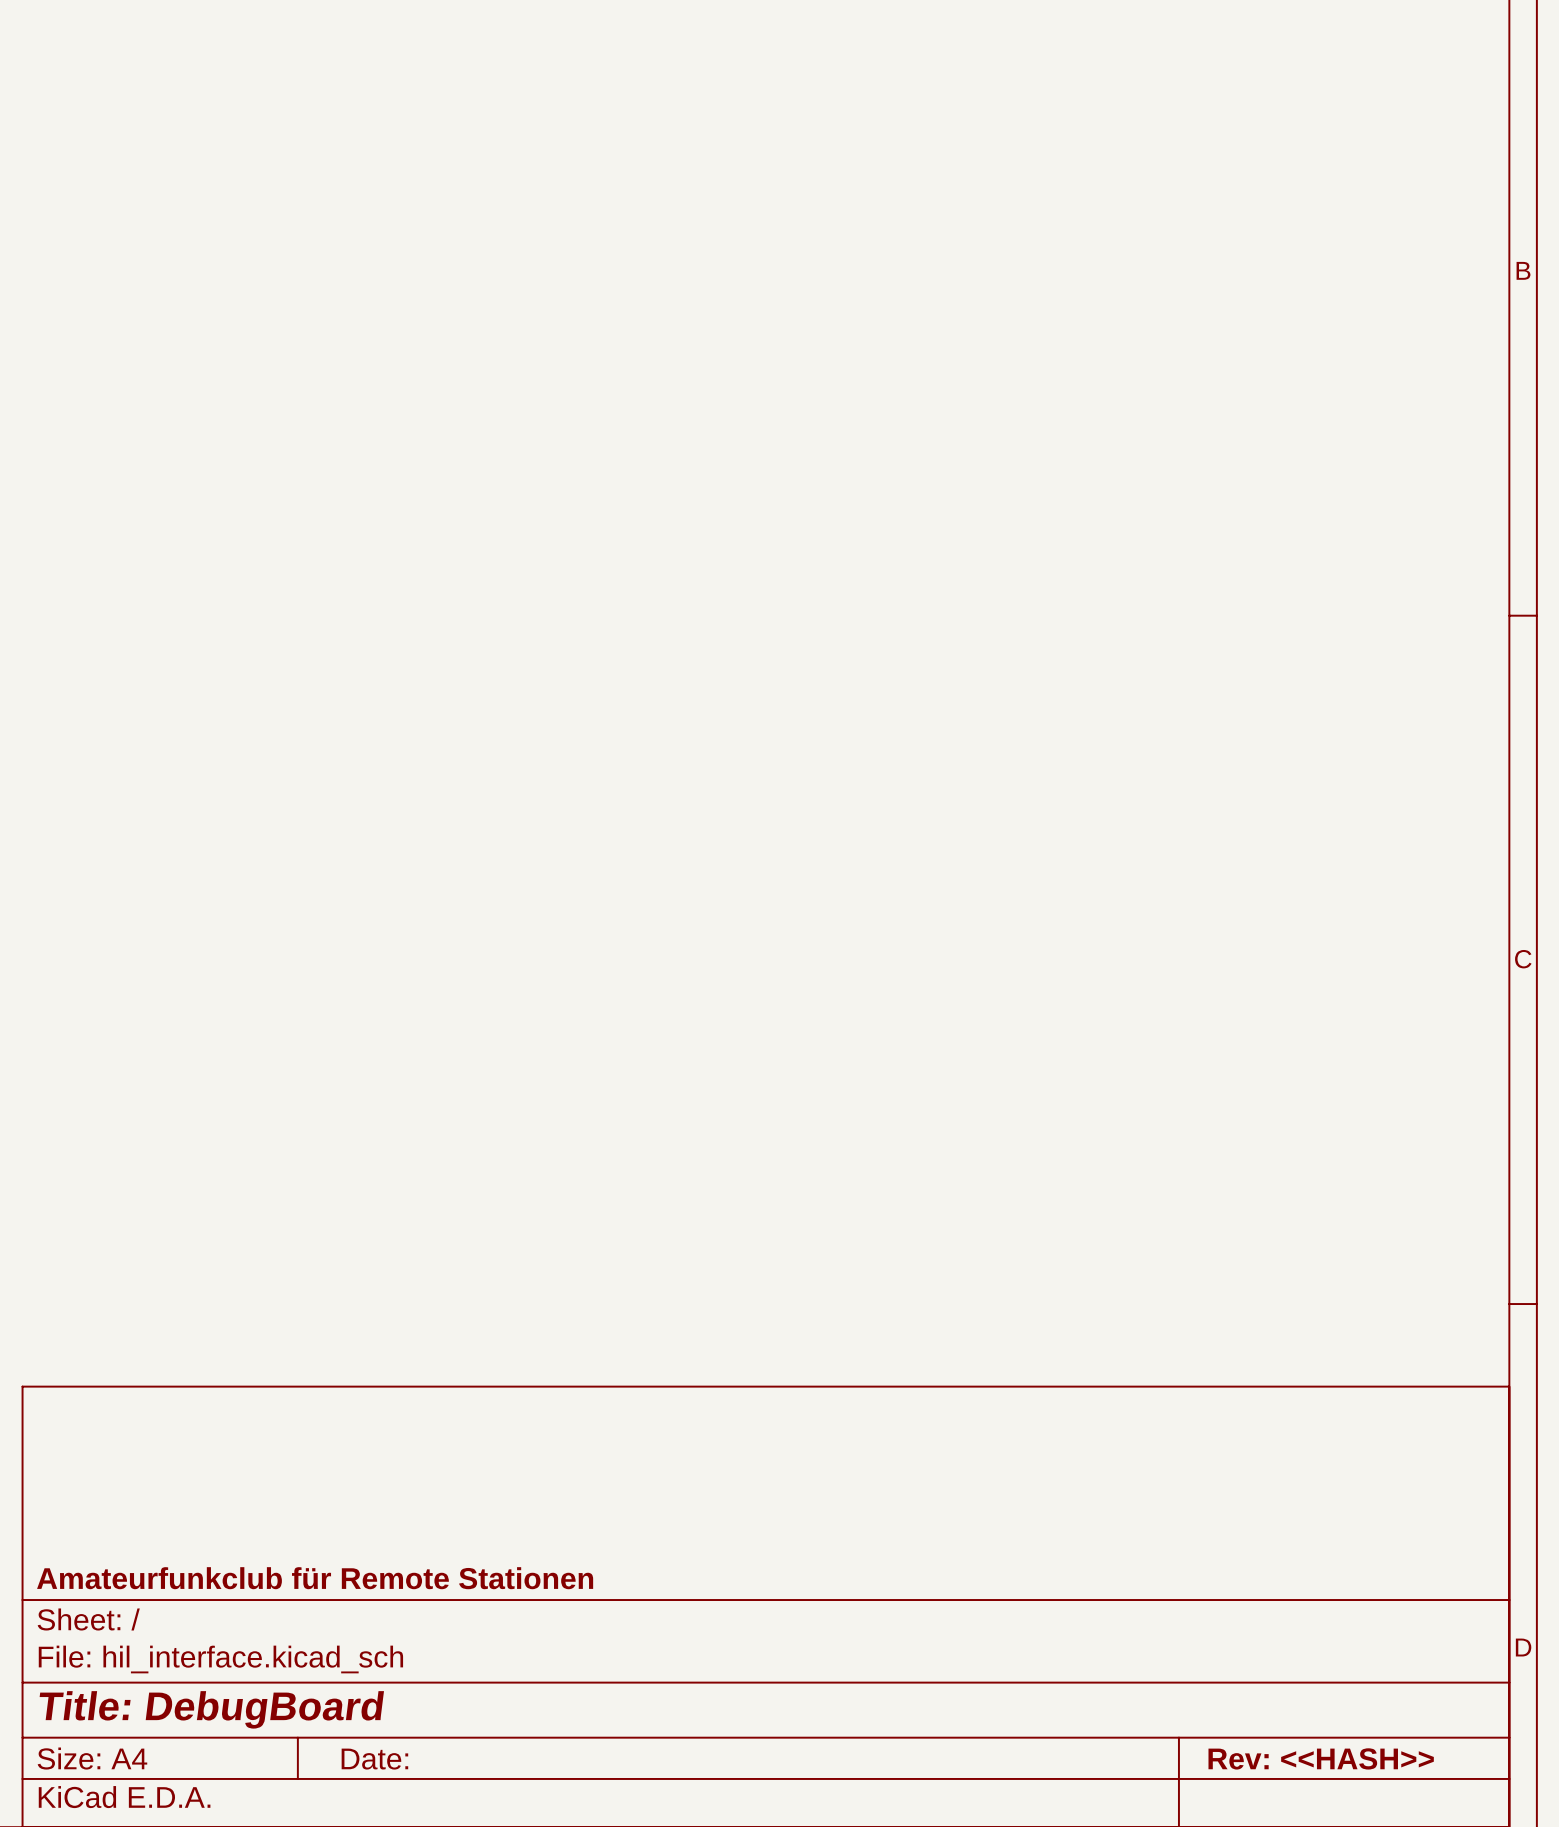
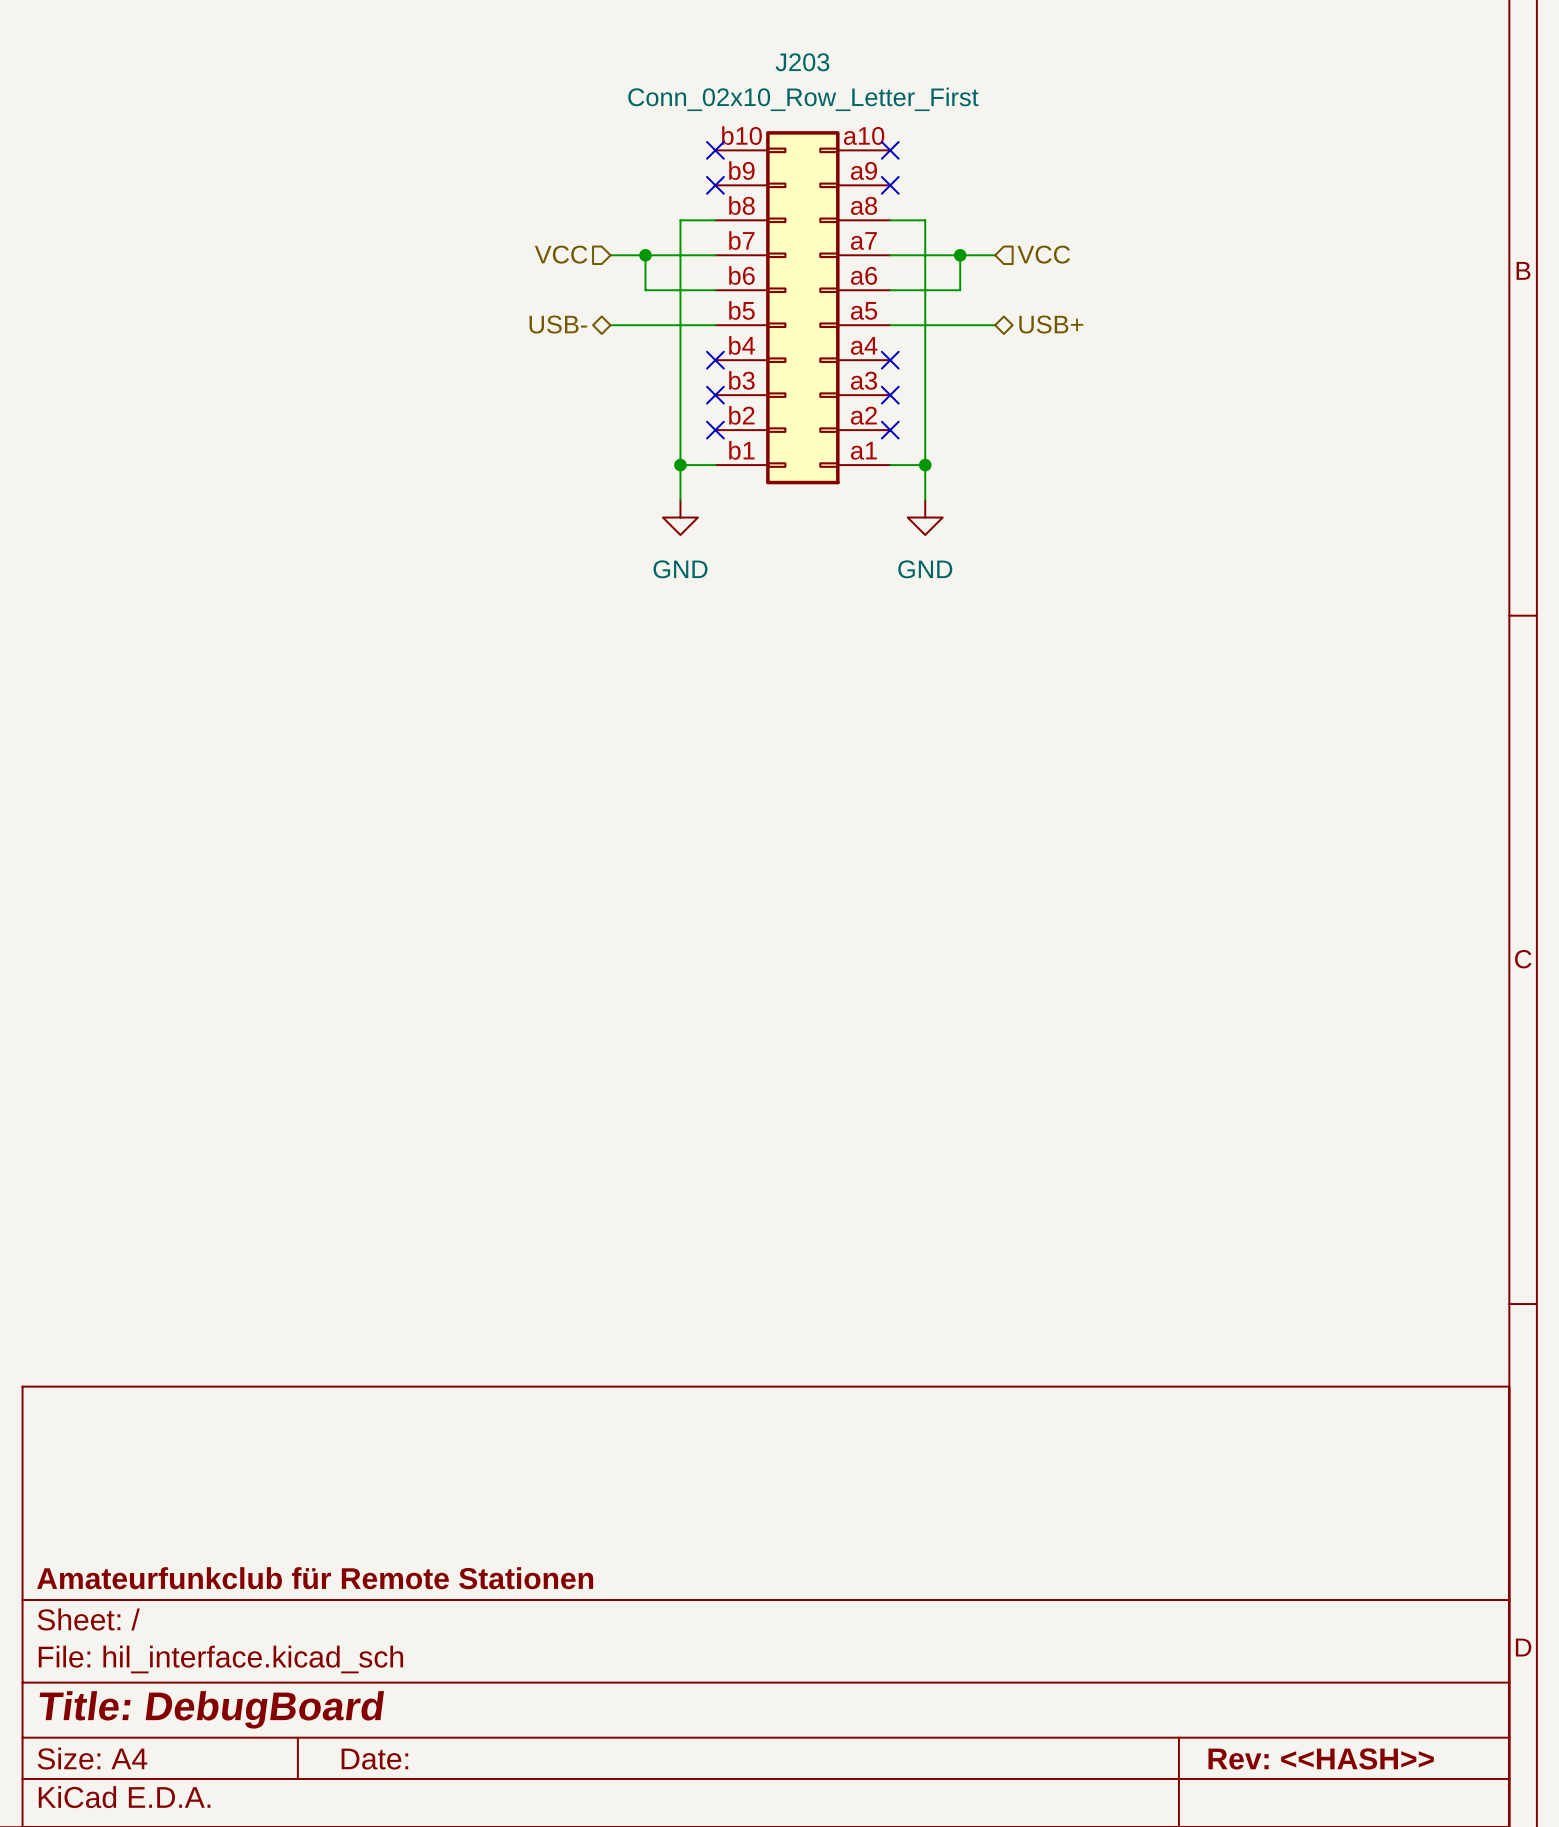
no-connect mark: none -> (715, 150)
no-connect mark: none -> (890, 150)
no-connect mark: none -> (715, 185)
no-connect mark: none -> (890, 185)
wire: none -> (715, 220) (680, 220) (680, 500)
wire: none -> (890, 220) (925, 220) (925, 500)
hierarchical label: none -> VCC (561, 254)
hierarchical label: none -> VCC (1043, 254)
wire: none -> (610, 255) (715, 255)
wire: none -> (645, 255) (645, 290) (715, 290)
junction: none -> (645, 255)
wire: none -> (890, 255) (995, 255)
wire: none -> (960, 255) (960, 290) (890, 290)
junction: none -> (960, 255)
J203: none -> Conn_02x10_Row_Letter_First (802, 307)
hierarchical label: none -> USB- (558, 324)
hierarchical label: none -> USB+ (1051, 324)
wire: none -> (610, 325) (715, 325)
wire: none -> (890, 325) (995, 325)
no-connect mark: none -> (715, 360)
no-connect mark: none -> (890, 360)
no-connect mark: none -> (715, 395)
no-connect mark: none -> (890, 395)
no-connect mark: none -> (715, 430)
no-connect mark: none -> (890, 430)
wire: none -> (680, 465) (715, 465)
junction: none -> (680, 465)
wire: none -> (890, 465) (925, 465)
junction: none -> (925, 465)
power symbol: none -> GND (680, 517)
power symbol: none -> GND (925, 517)

